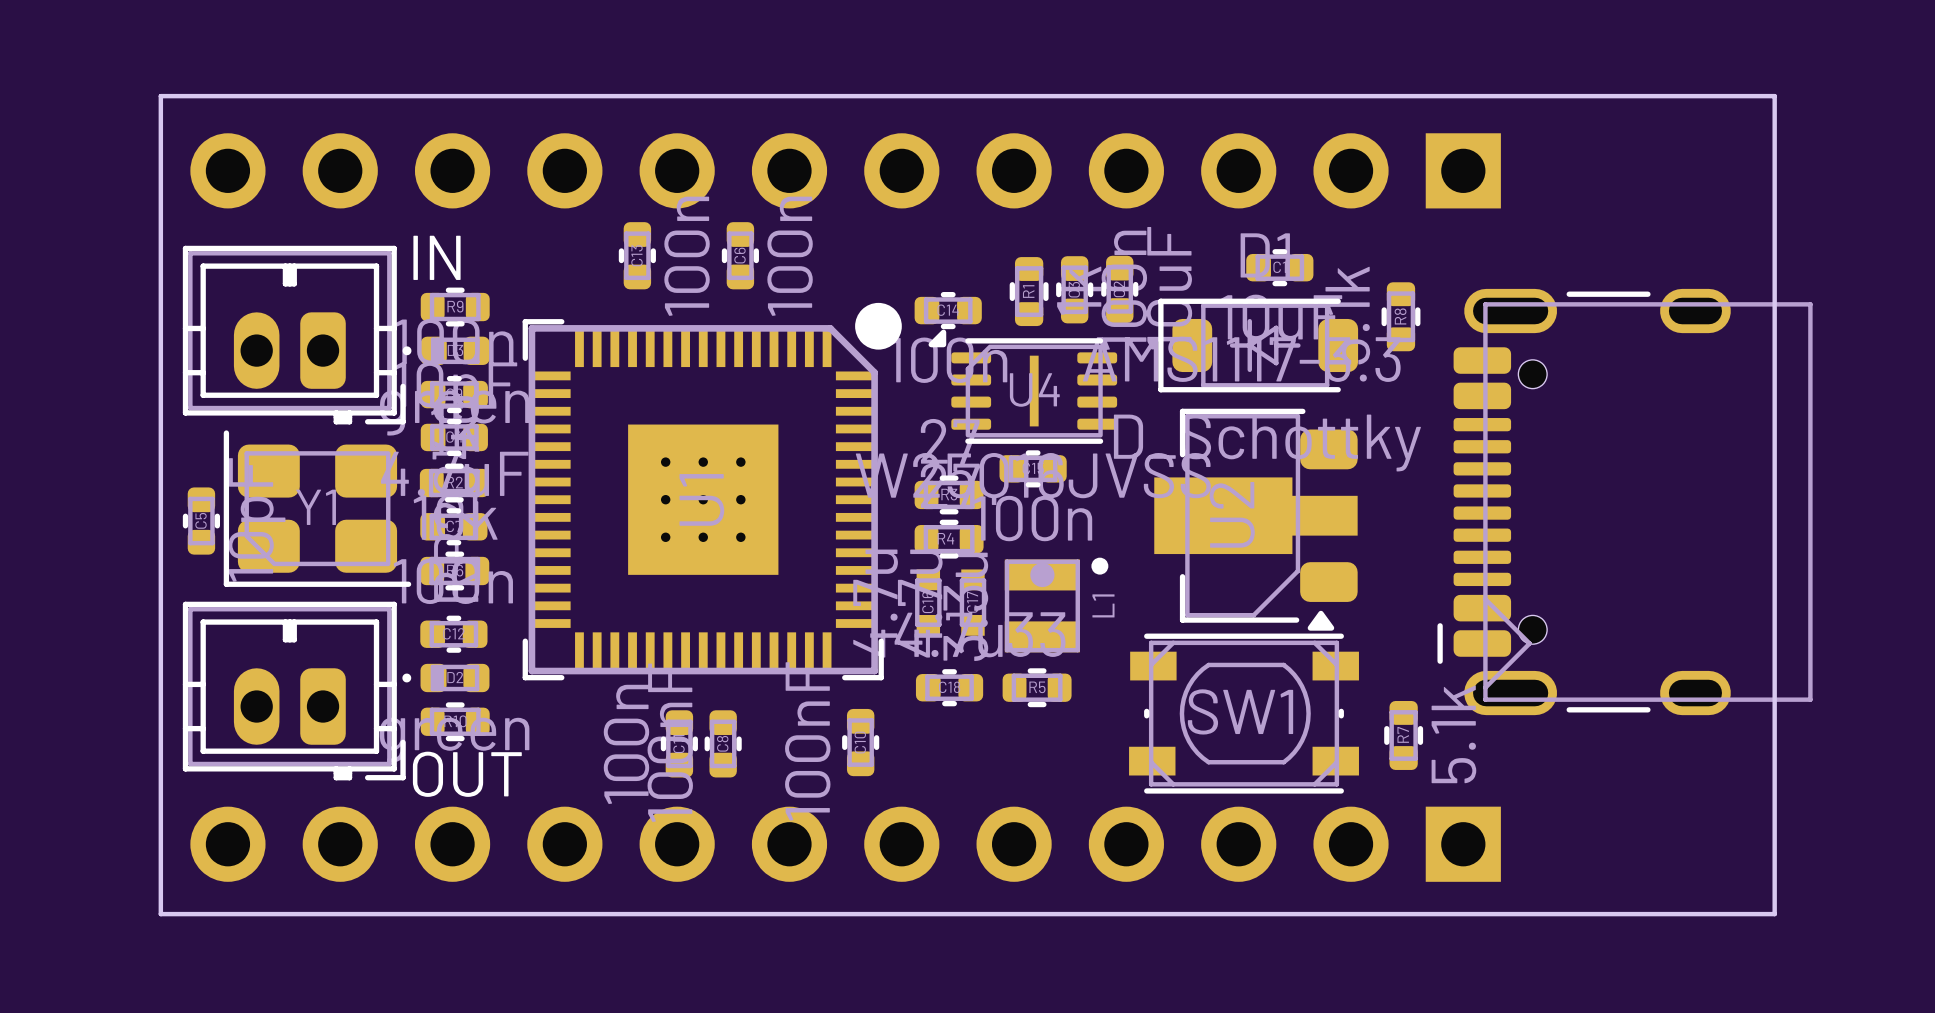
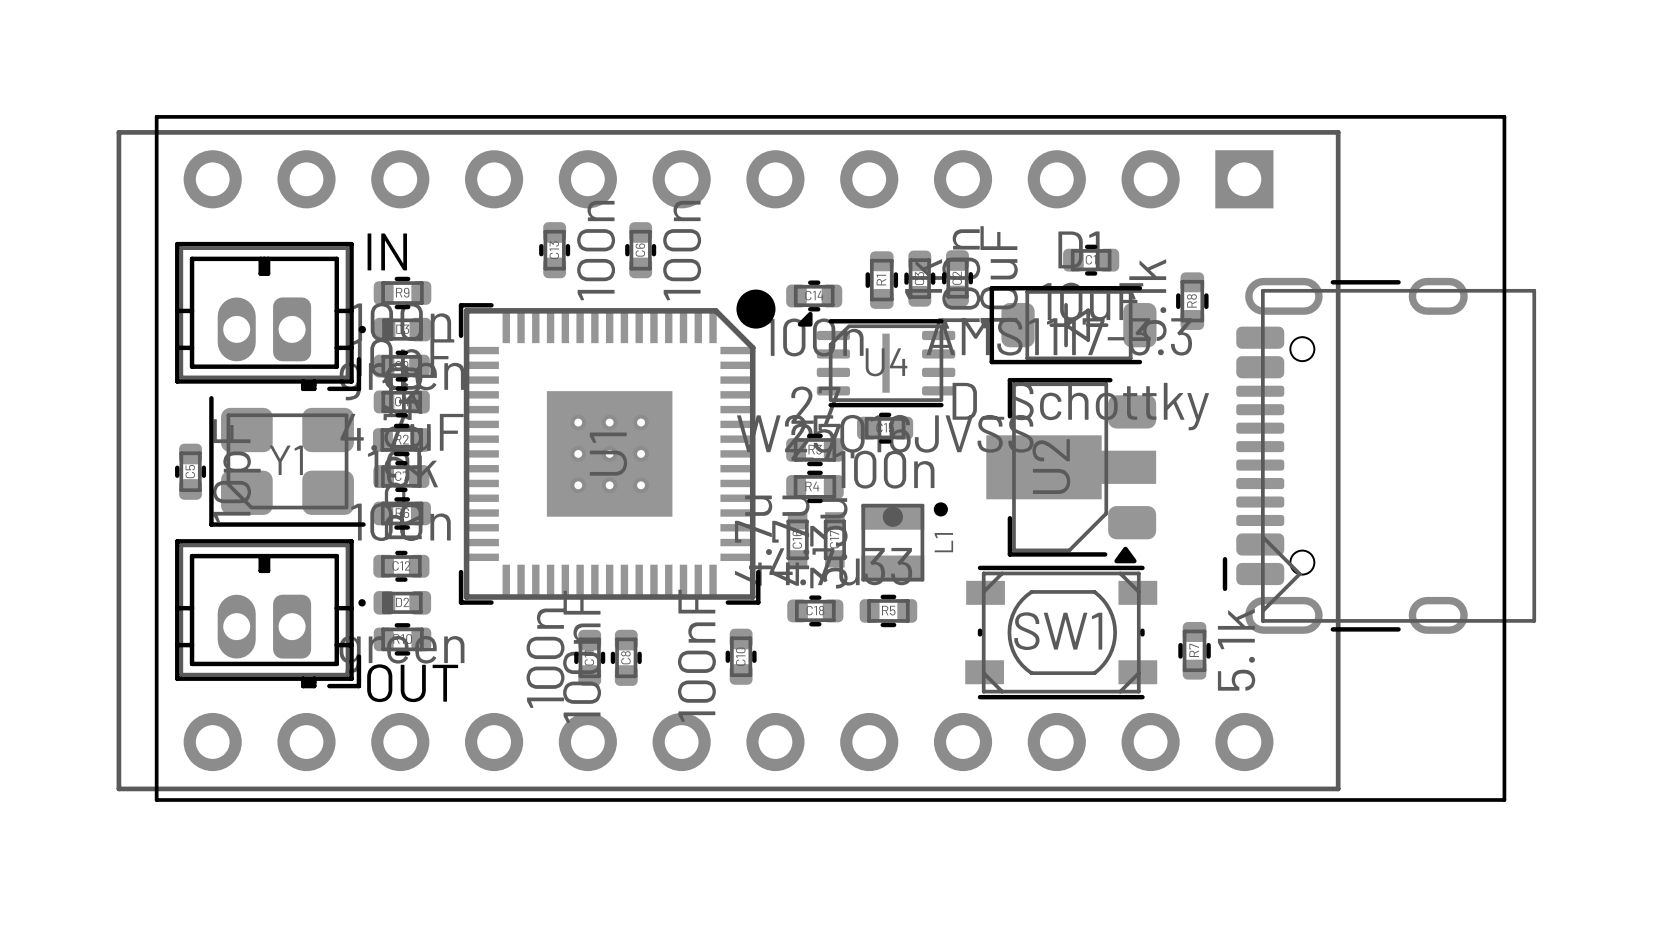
part: (845, 170) -> none
part: none -> (728, 460)
part: (845, 844) -> none

